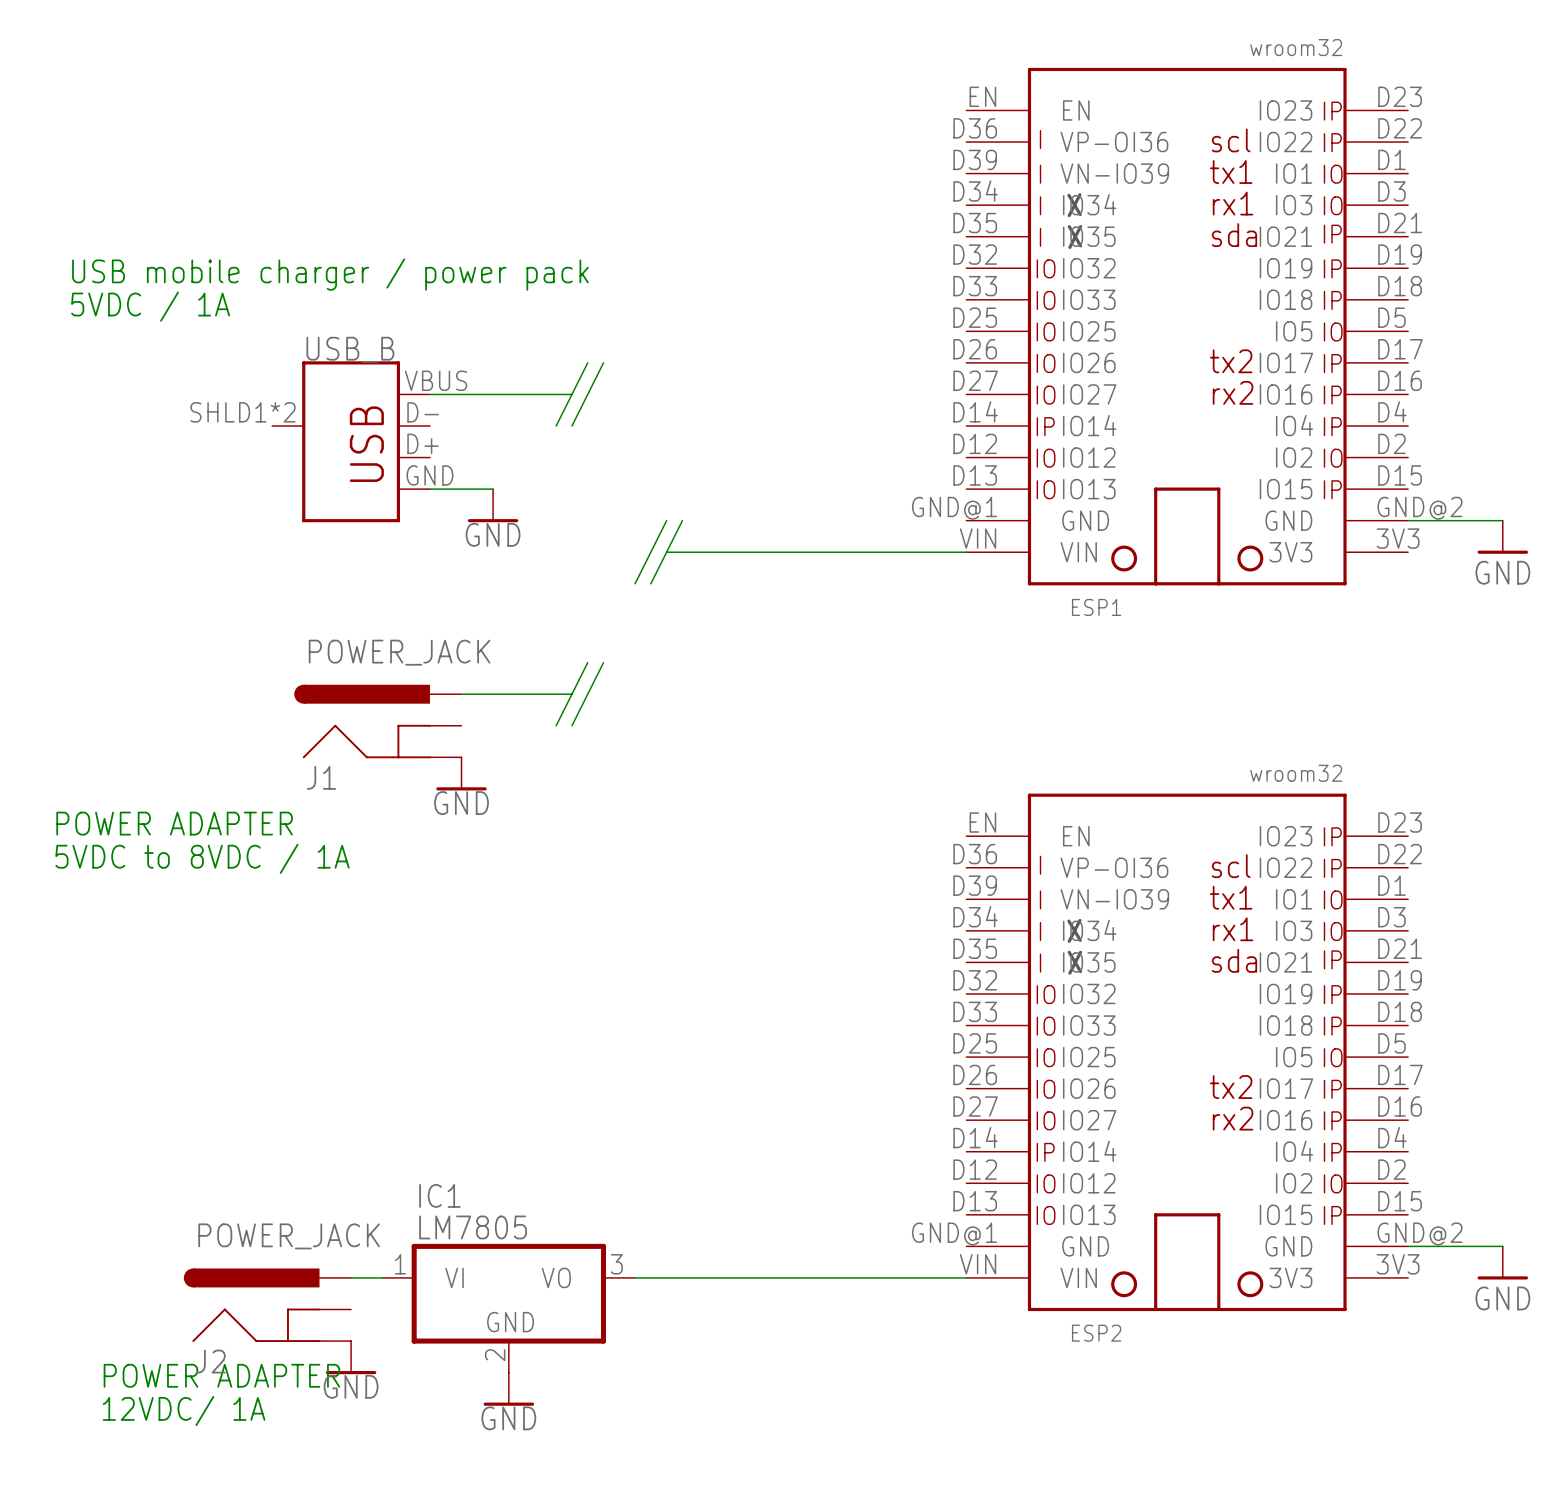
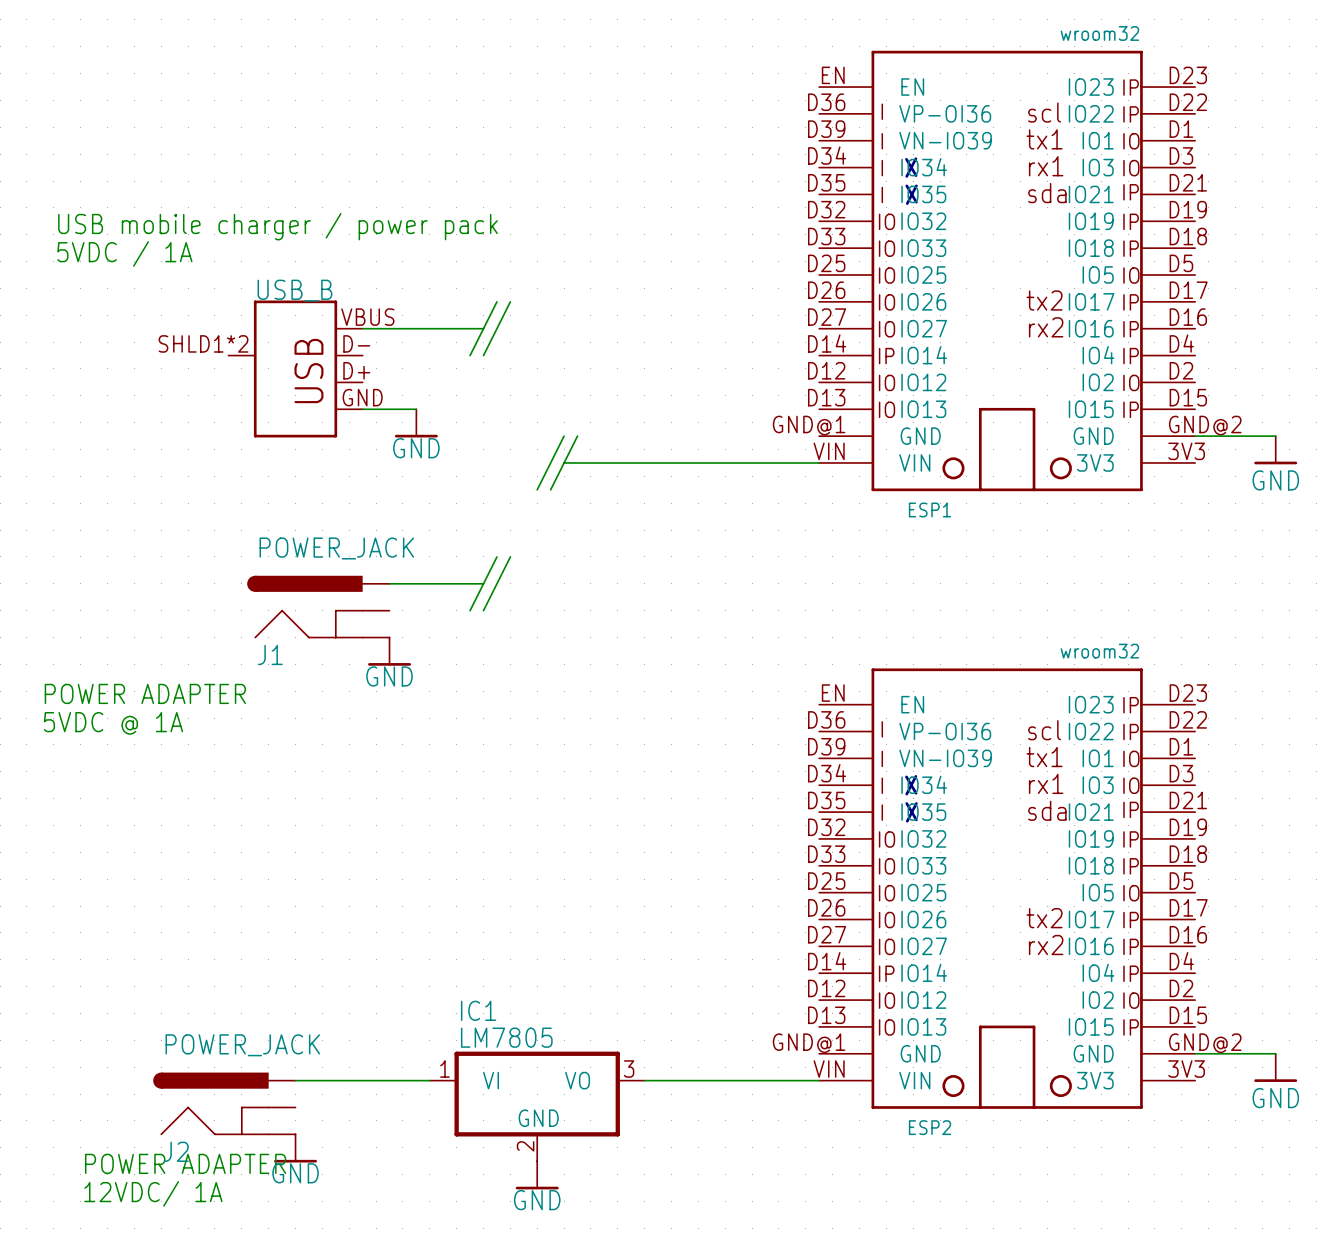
text: 5VDC to 8VDC / 1A (202, 858) -> 5VDC @ 1A (113, 723)
wire: (635, 1277) (761, 1277) -> (322, 1080) (429, 1080)
IC1 position: (508, 1308) -> (537, 1106)
power symbol position: GND (508, 1389) -> GND (537, 1175)

